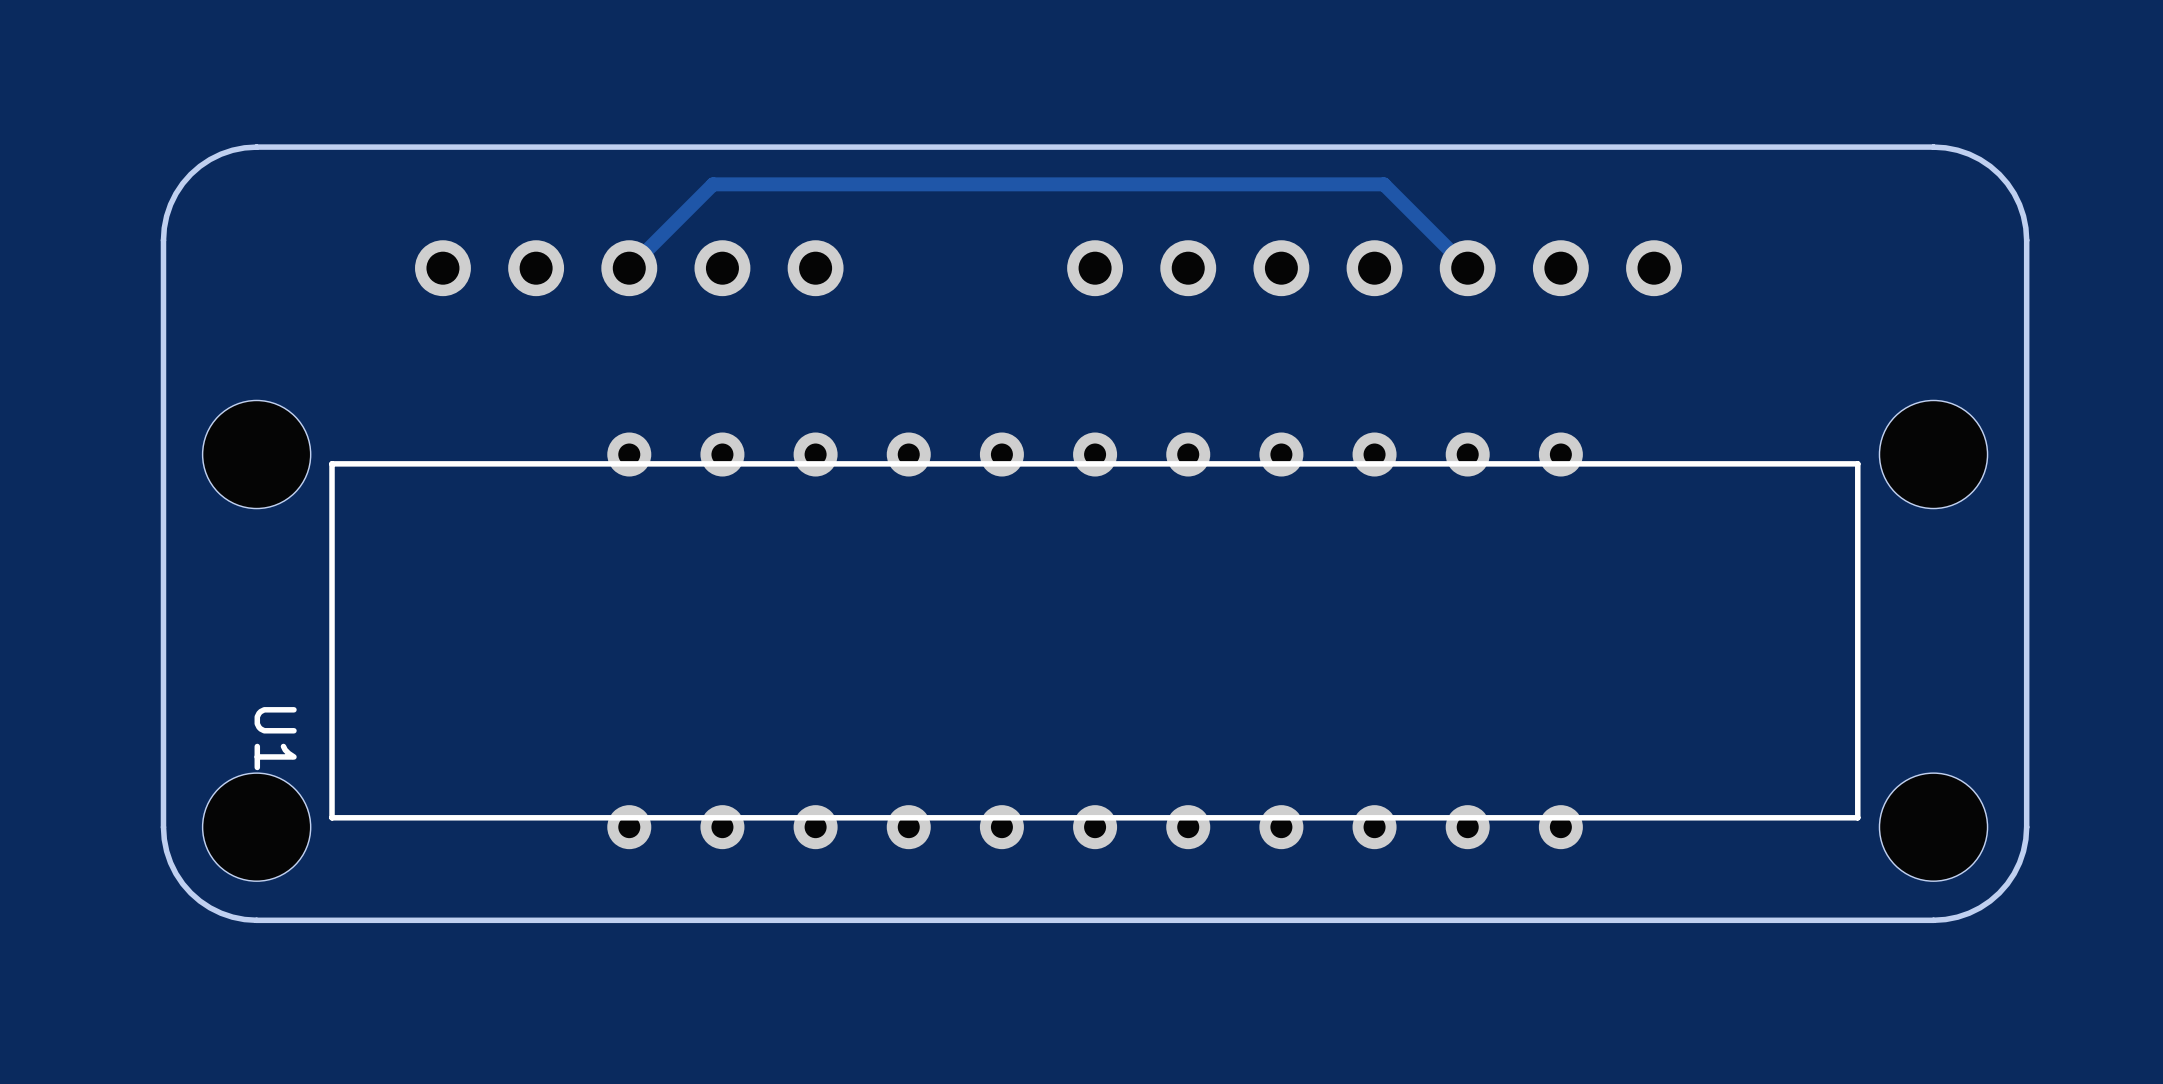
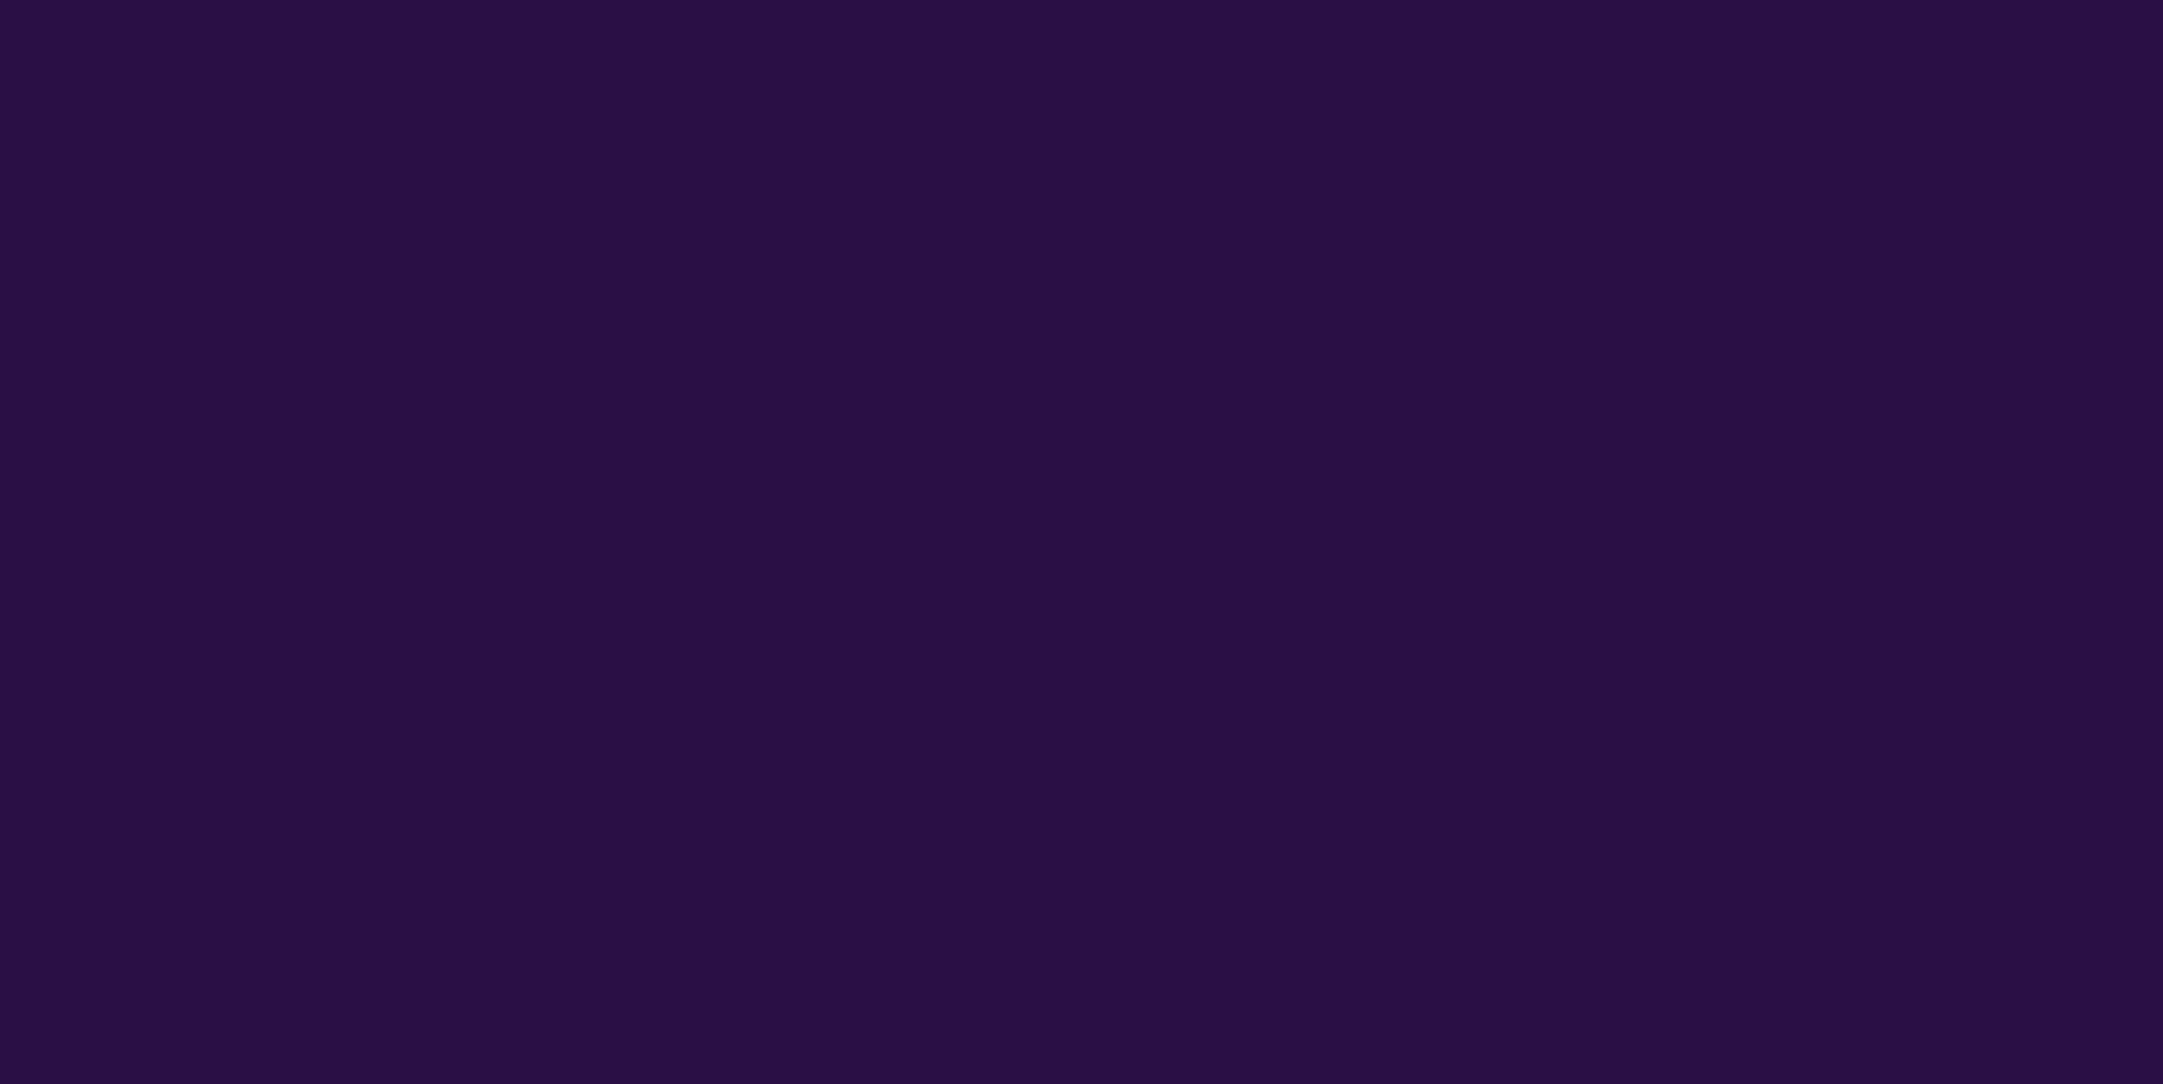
board edge: (1933, 147) (256, 147) (244, 147) (220, 154) (199, 166) (182, 183) (170, 204) (164, 228) (163, 827) (166, 851) (170, 862) (182, 883) (190, 893) (210, 907) (232, 917) (256, 920) (1933, 920) (1945, 919) (1969, 913) (1990, 901) (2007, 883) (2019, 862) (2025, 839) (2026, 240) (2023, 216) (2019, 204) (2007, 183) (1999, 174) (1980, 159) (1969, 154) (1945, 147) (1933, 147) -> none
part: (629, 268) -> none
part: (1374, 268) -> none
track: (1467, 268) (1383, 184) (713, 184) (629, 268) -> none
part: (256, 454) -> none
part: (1933, 454) -> none
U1: (1094, 640) -> none
part: (256, 827) -> none
part: (1933, 827) -> none

